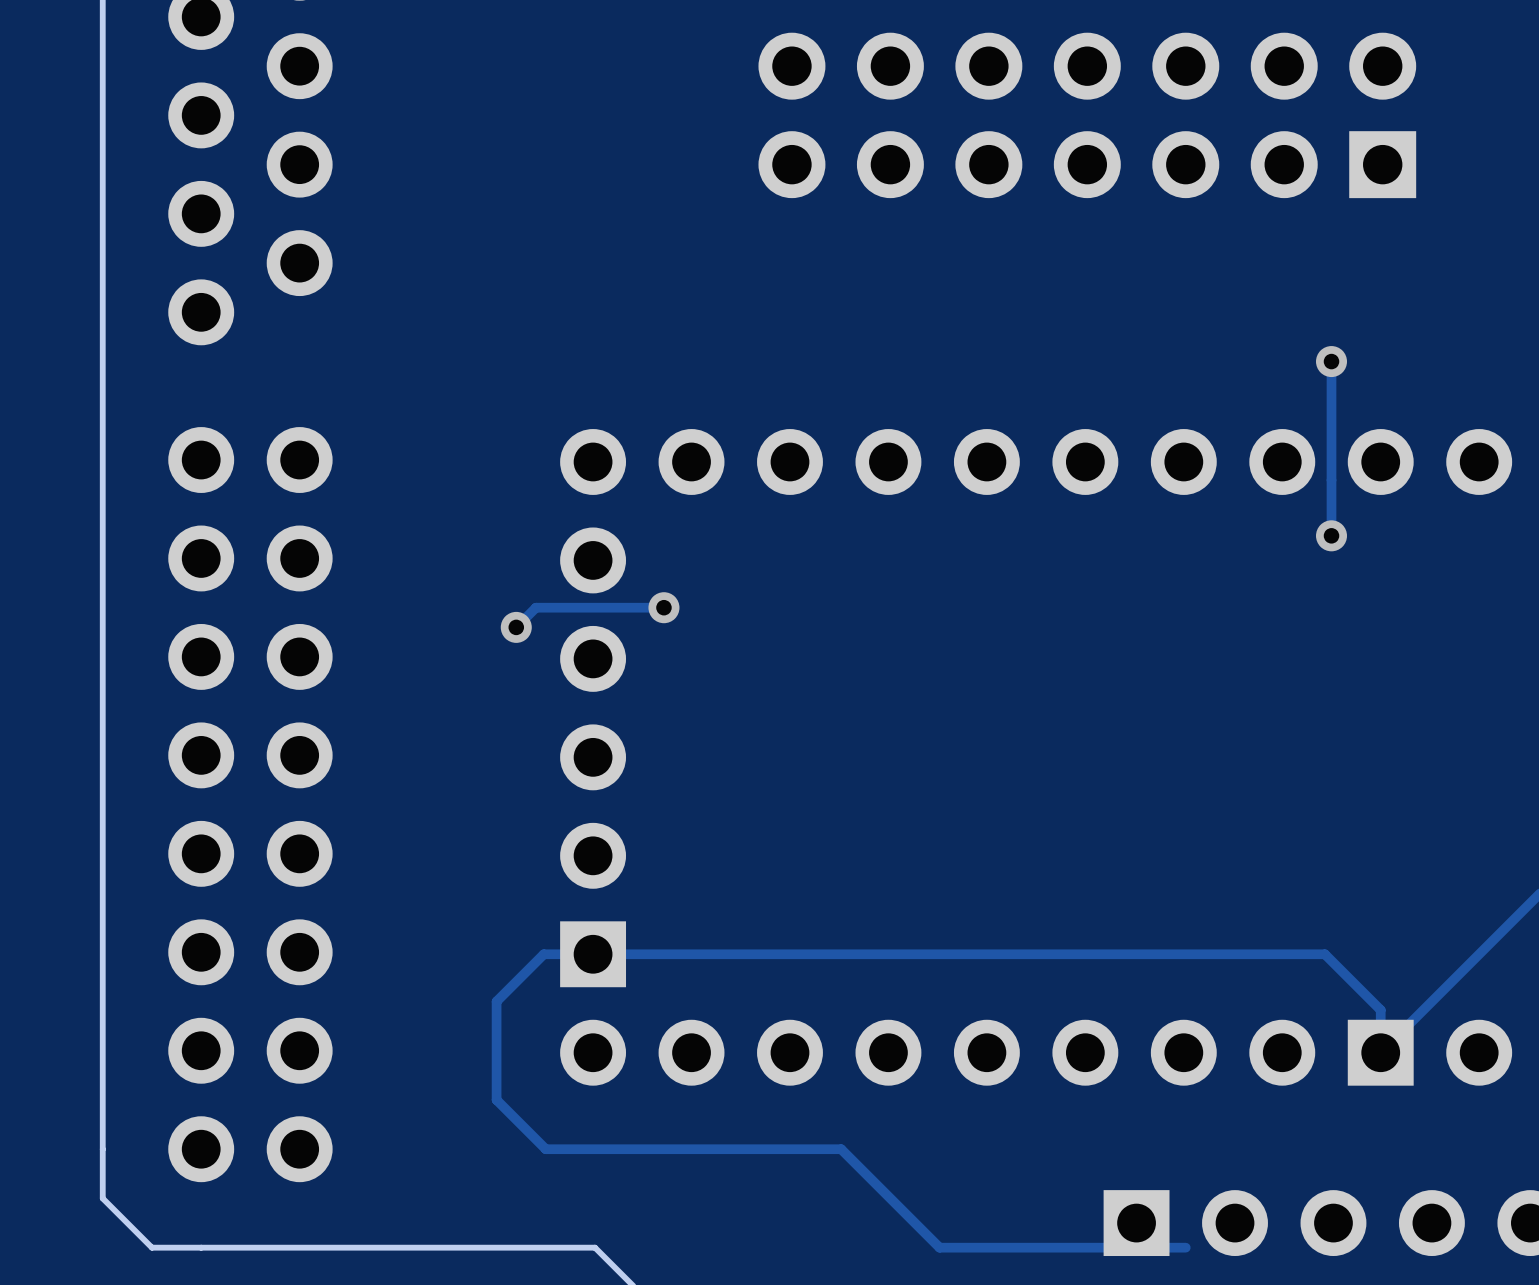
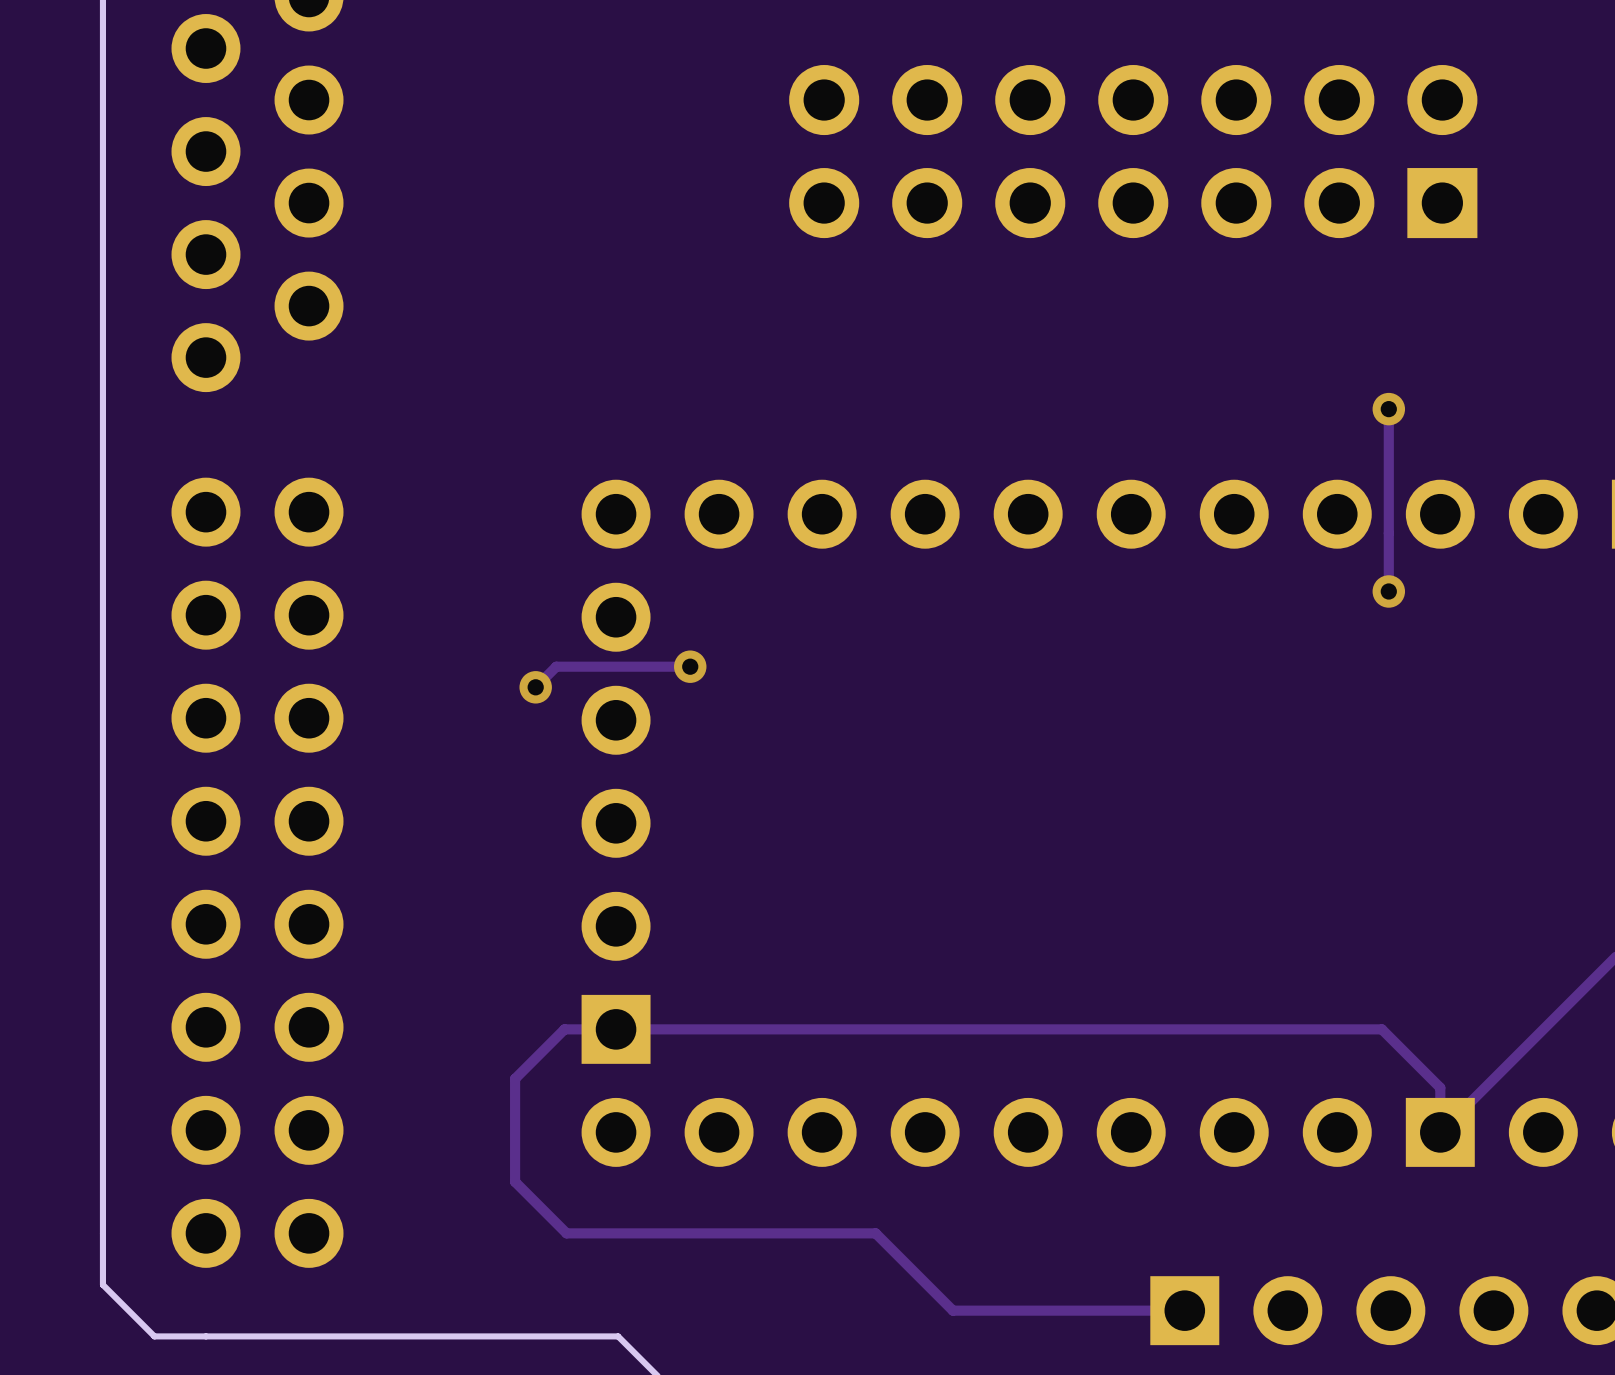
track: (915, 1223) (939, 1247) (1185, 1247) -> (952, 1310) (1184, 1310)

